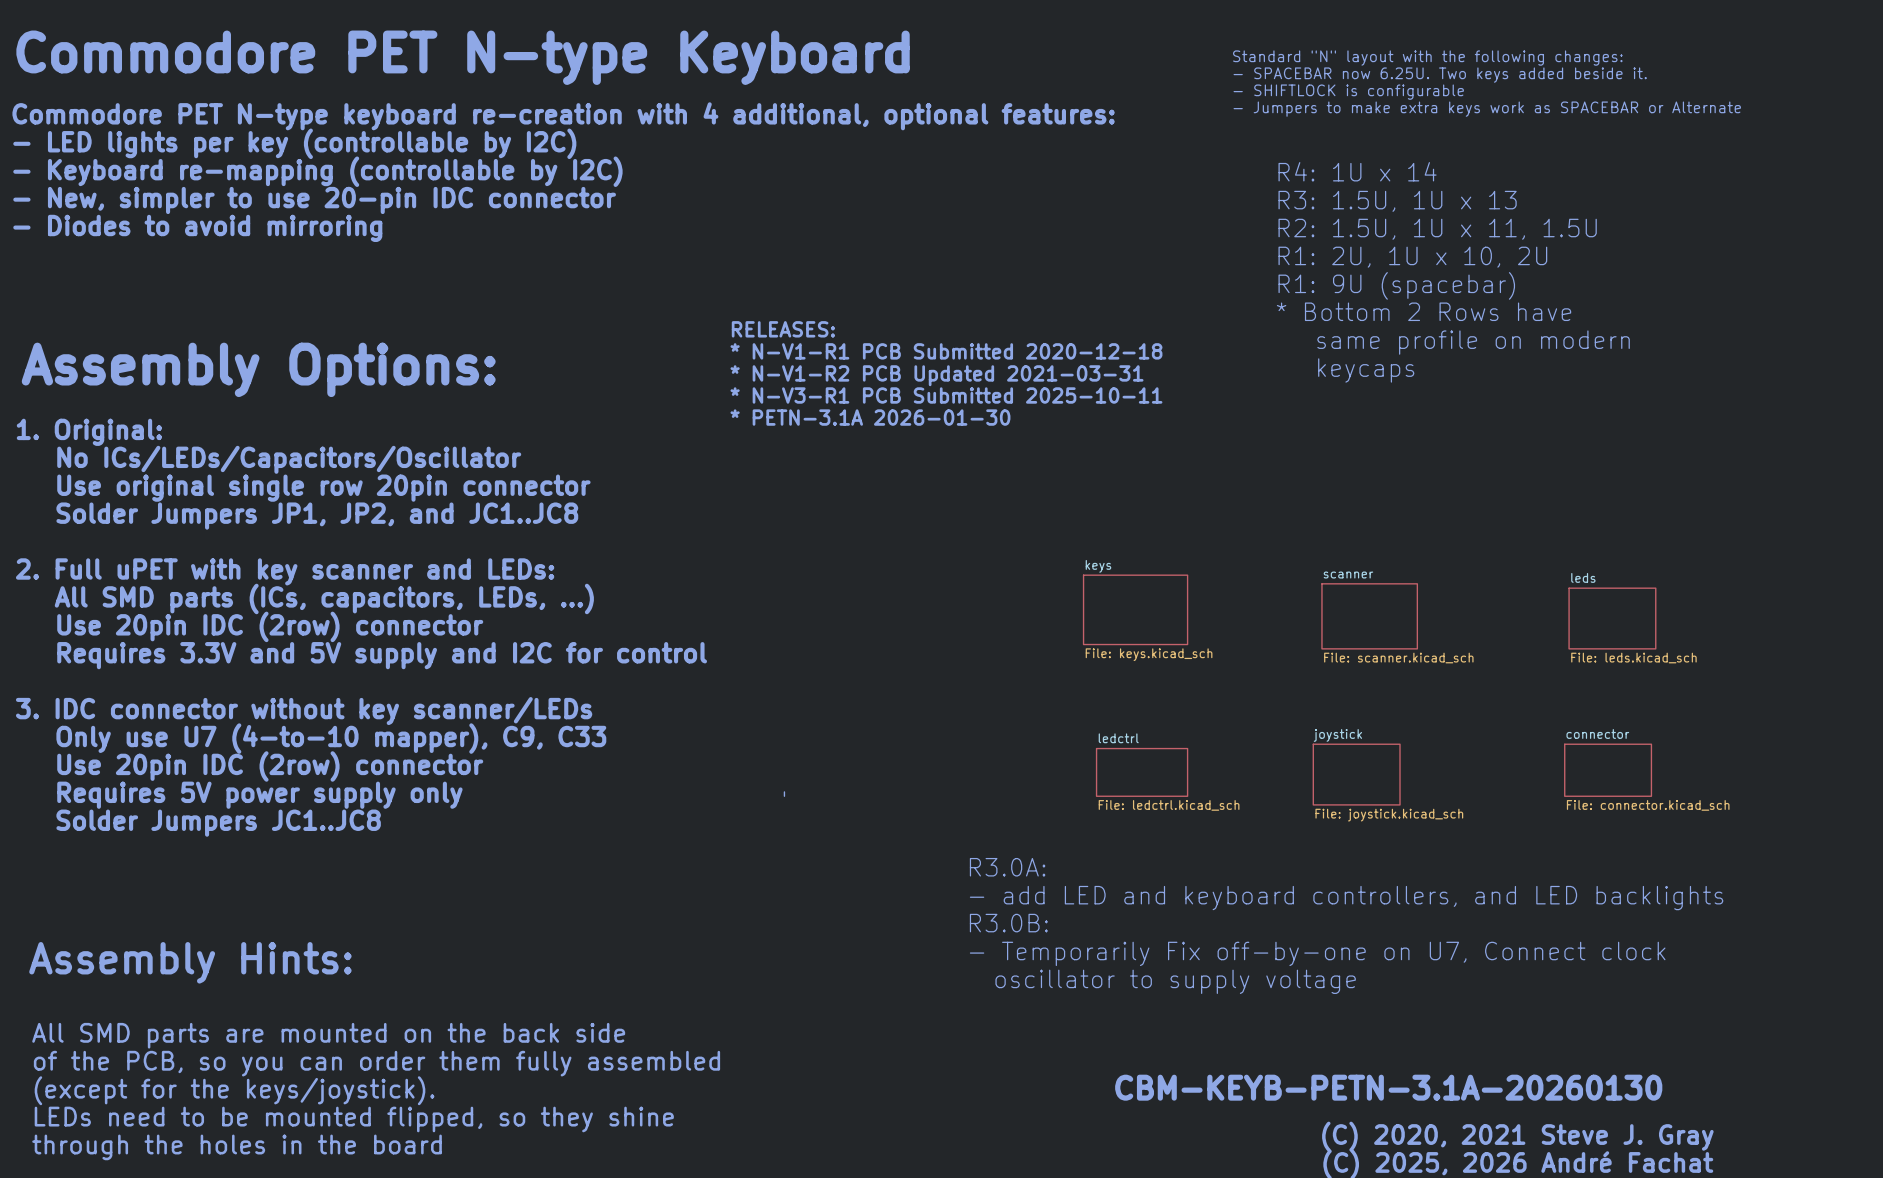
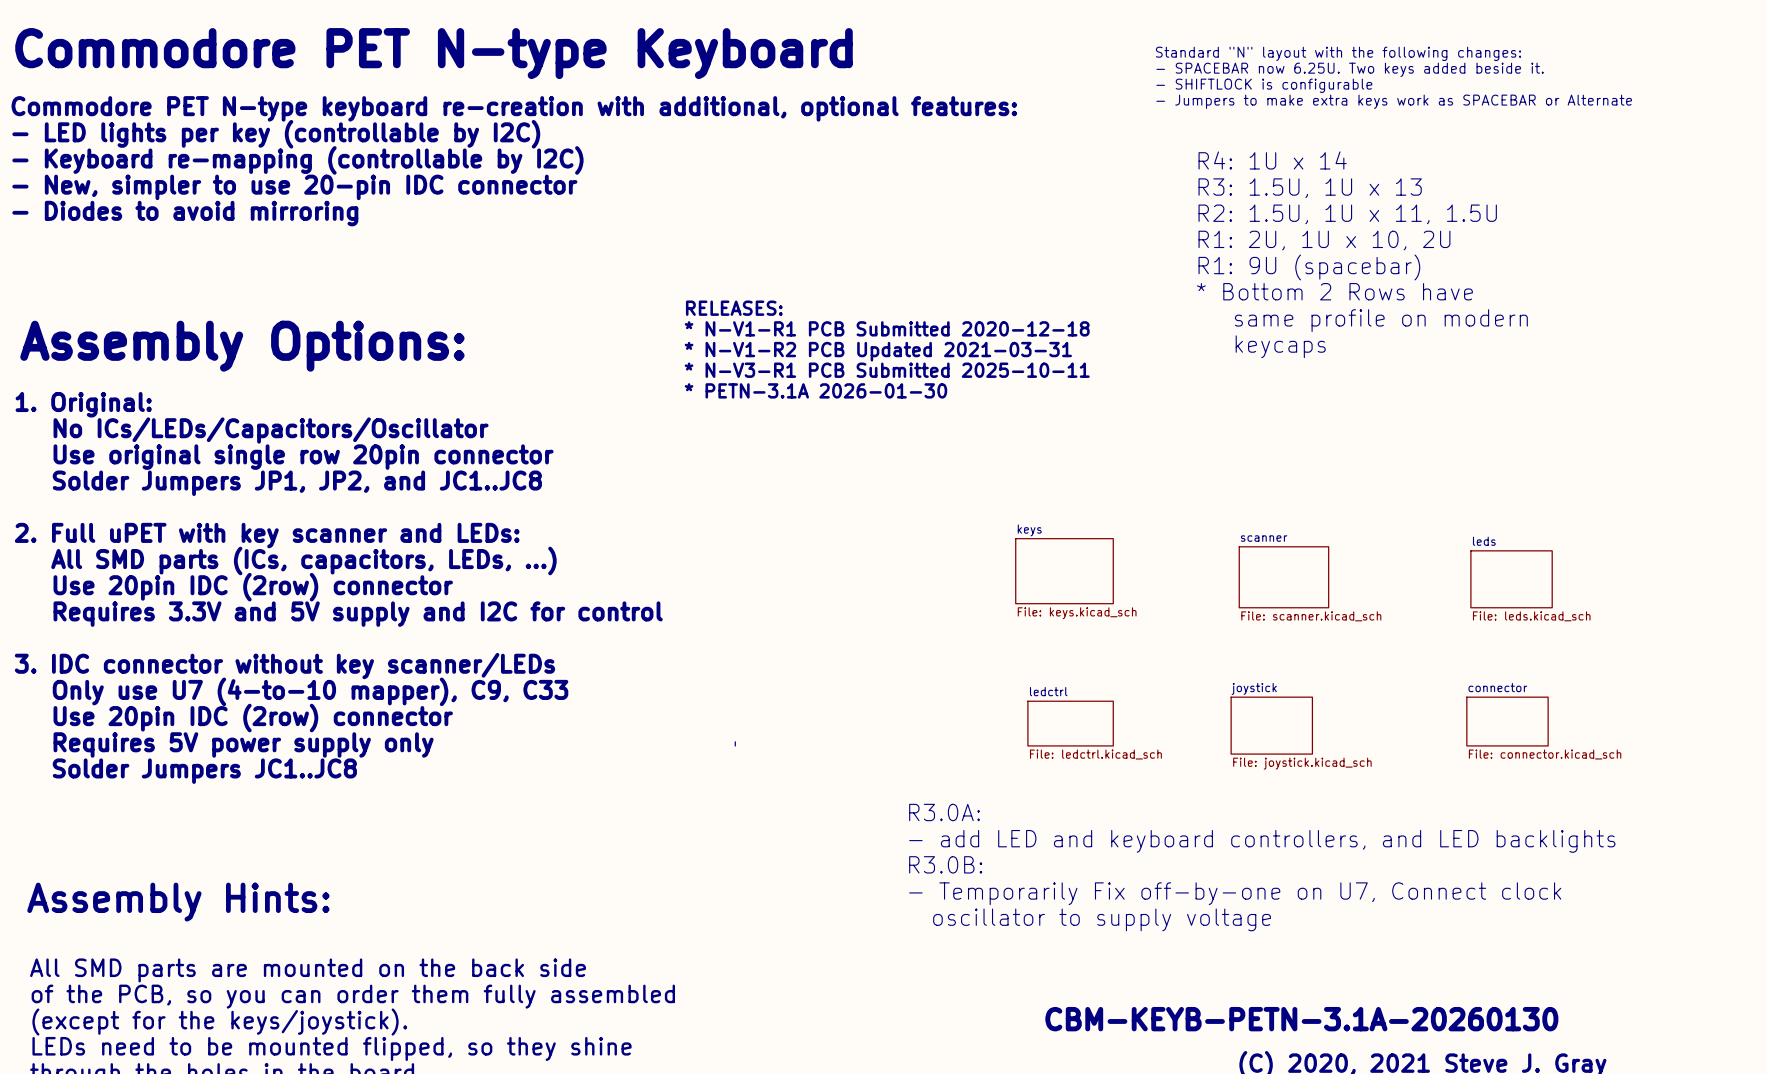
text: Commodore PET N-type keyboard re-creation with 4 additional, optional features: (563, 116) -> Commodore PET N-type keyboard re-creation with additional, optional features: (514, 108)

